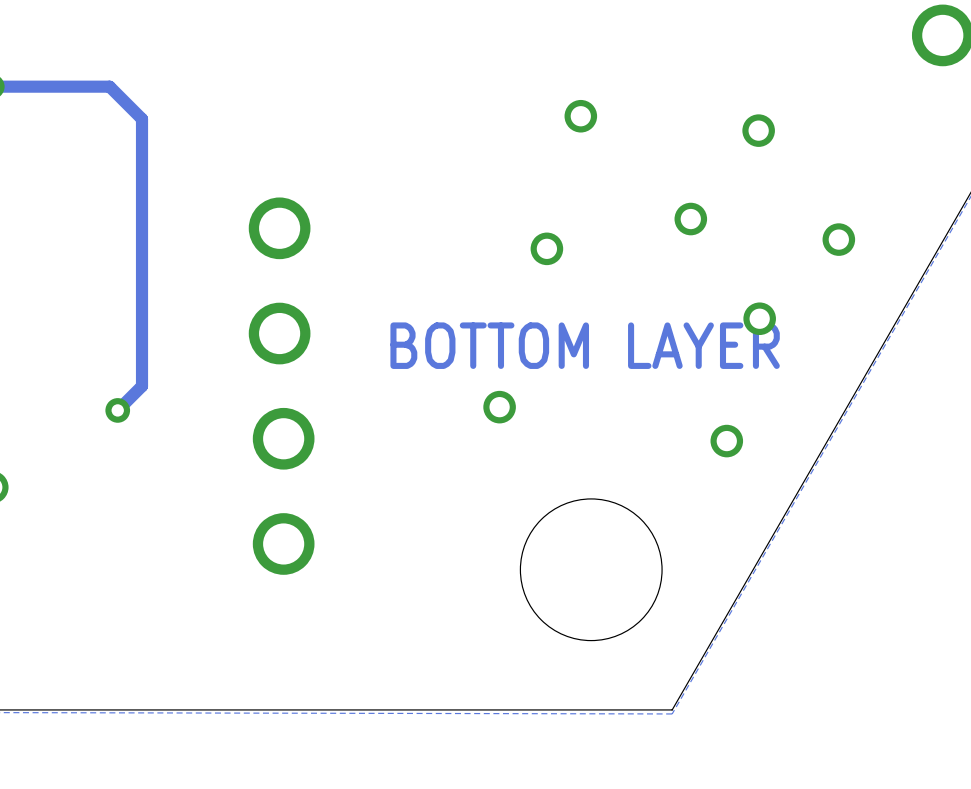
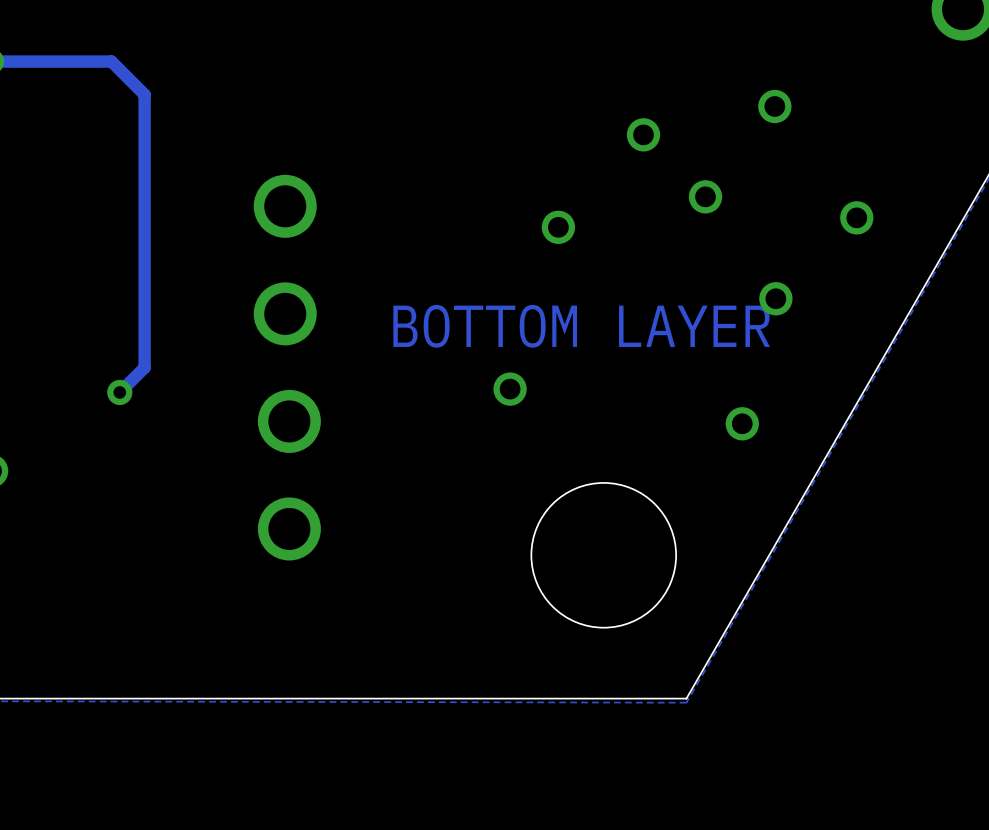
via position: (580, 116) -> (643, 134)

